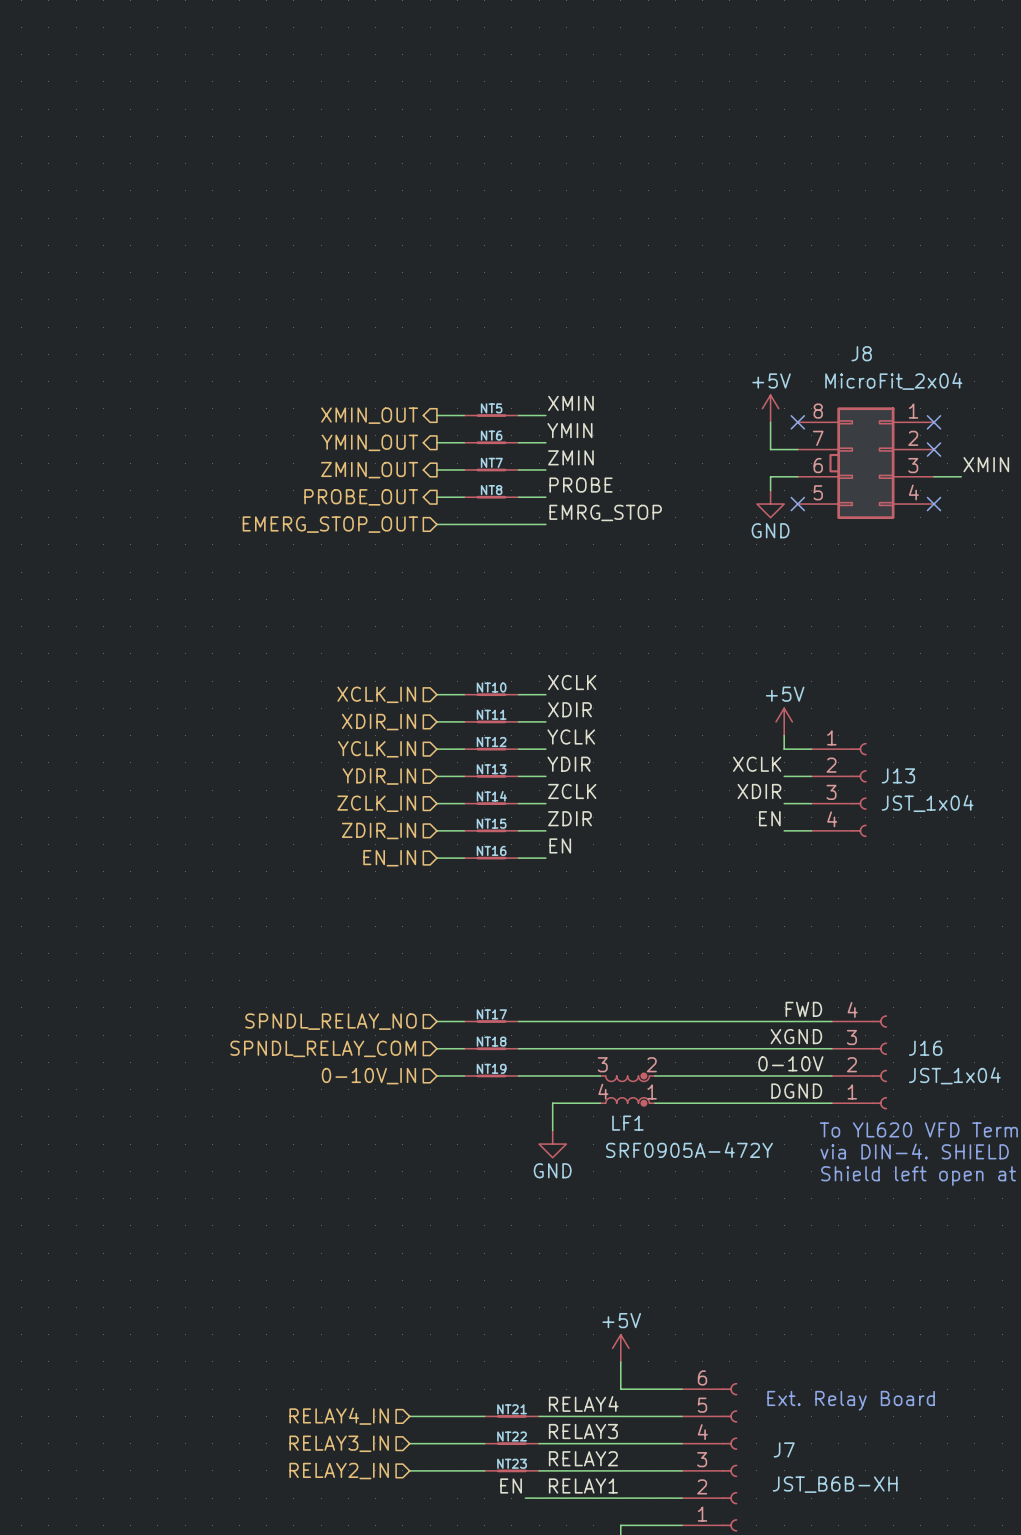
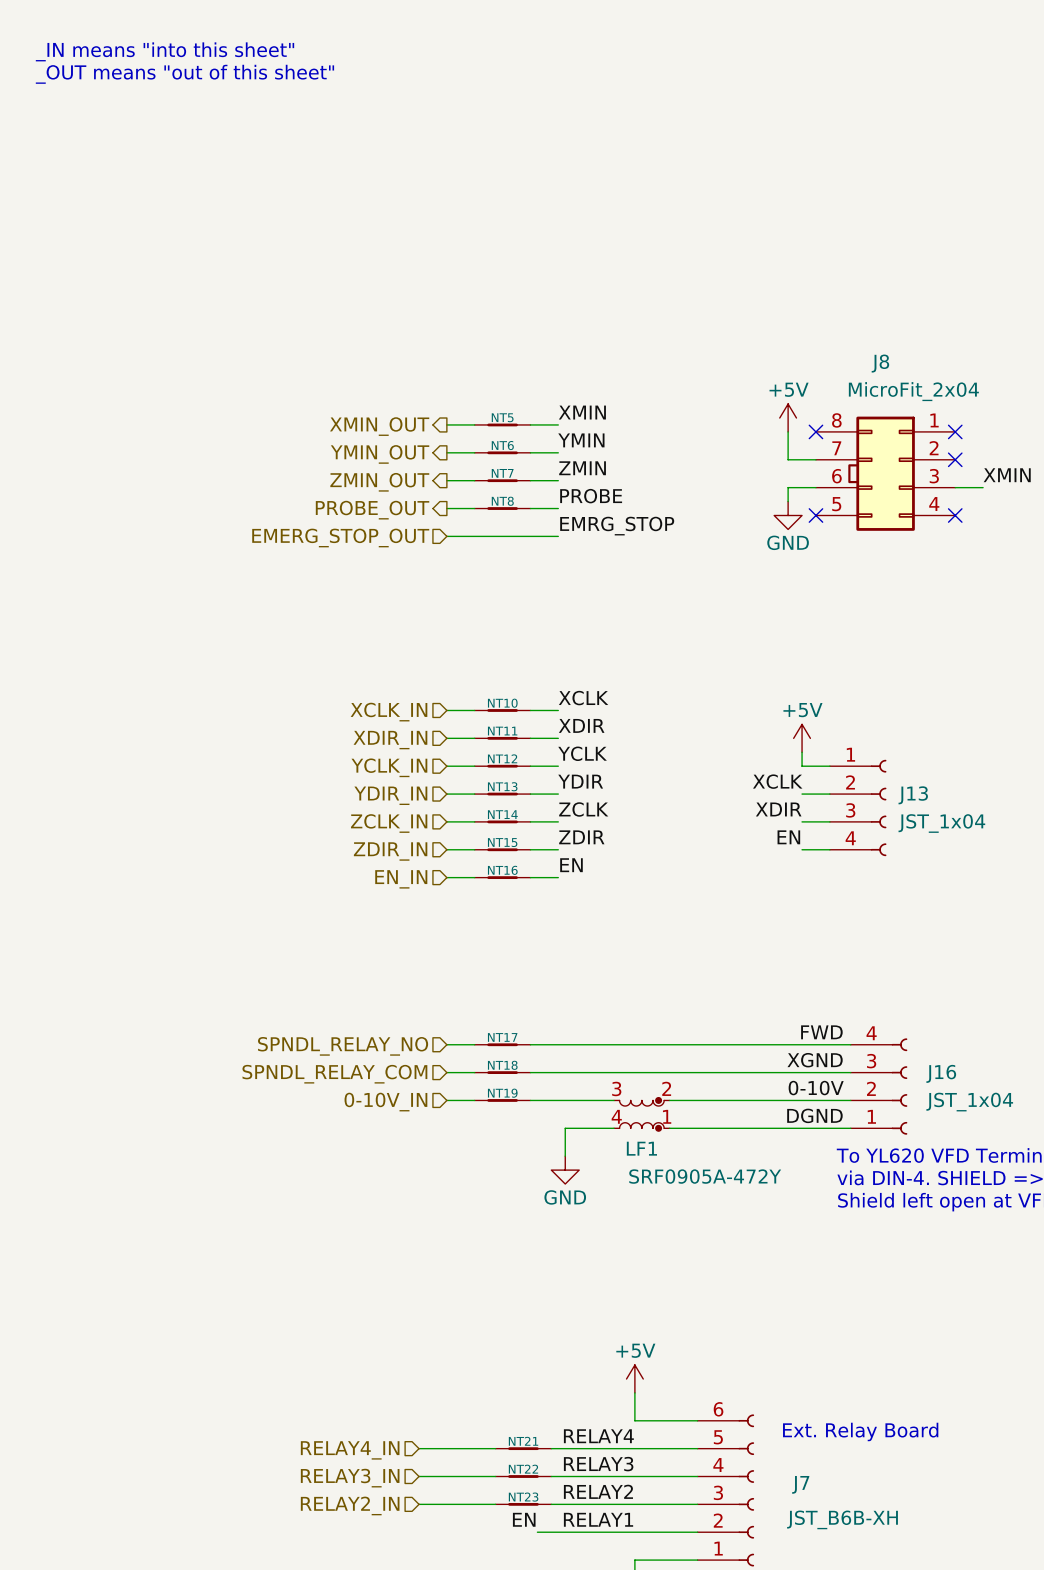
text: none -> _IN means "into this sheet" (164, 51)
text: none -> _OUT means "out of this sheet" (184, 74)

